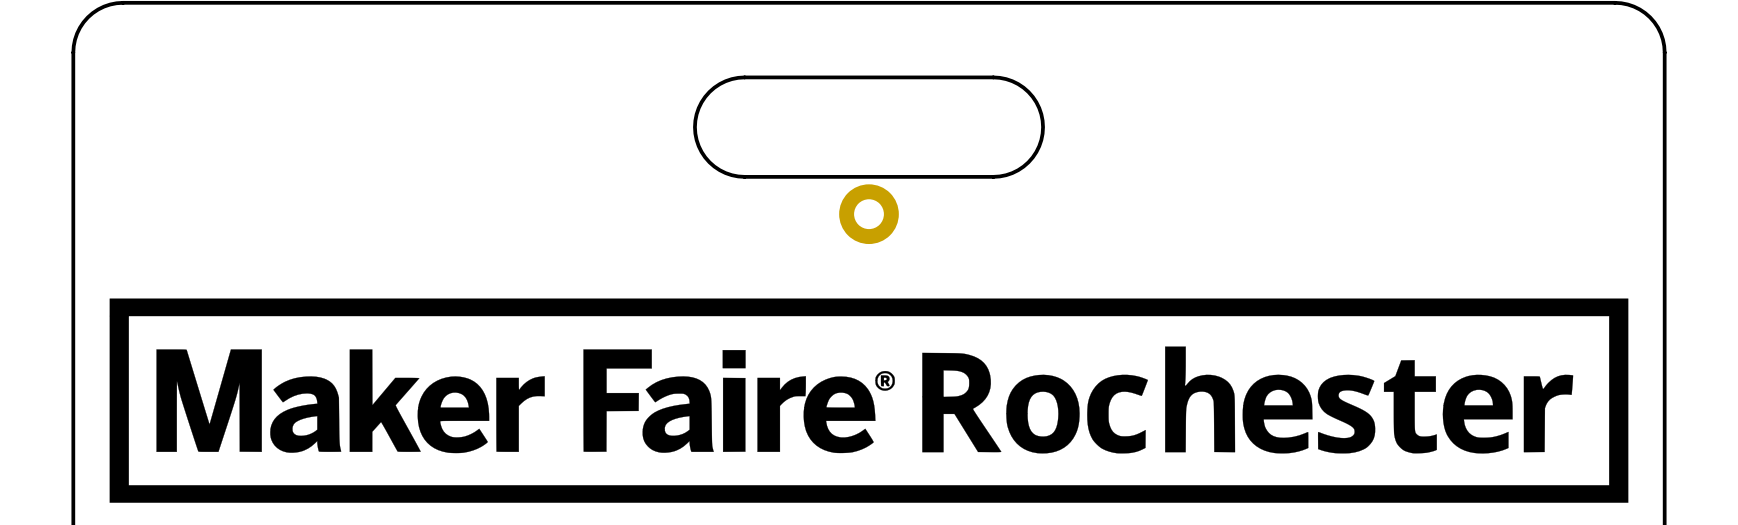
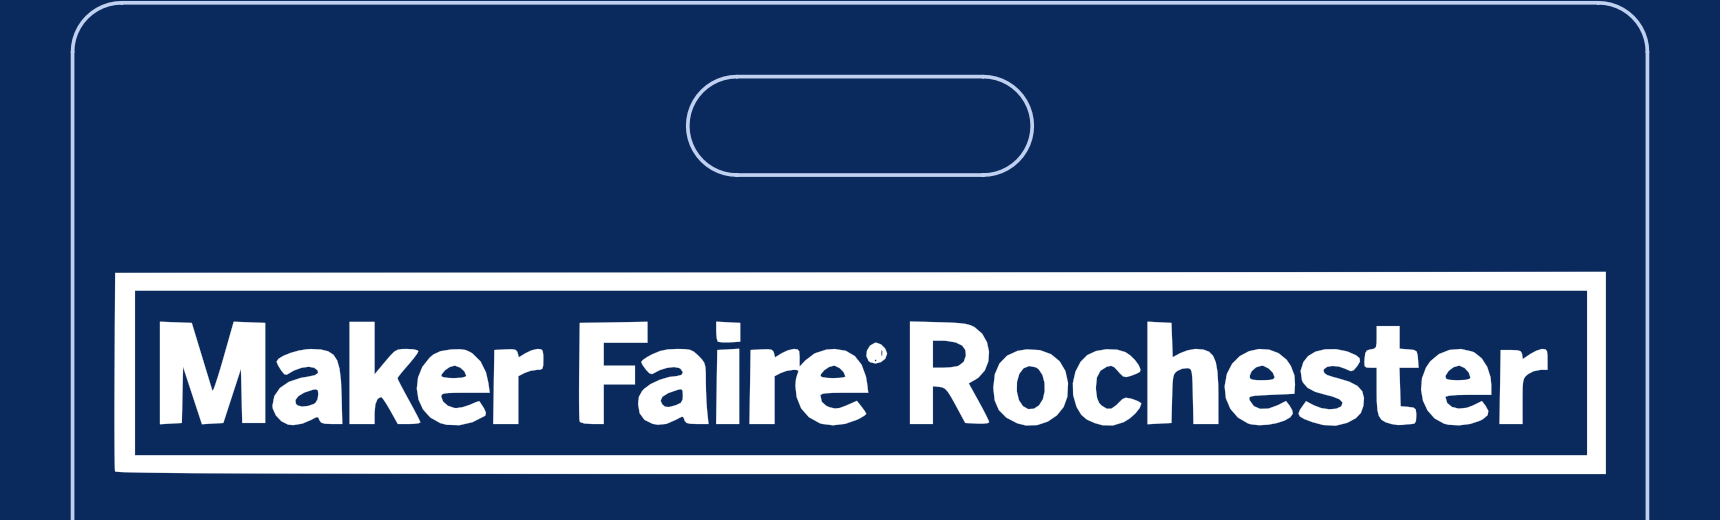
part: (868, 214) -> none
drawing shape: [109, 298, 1629, 503] -> [114, 271, 1606, 475]

